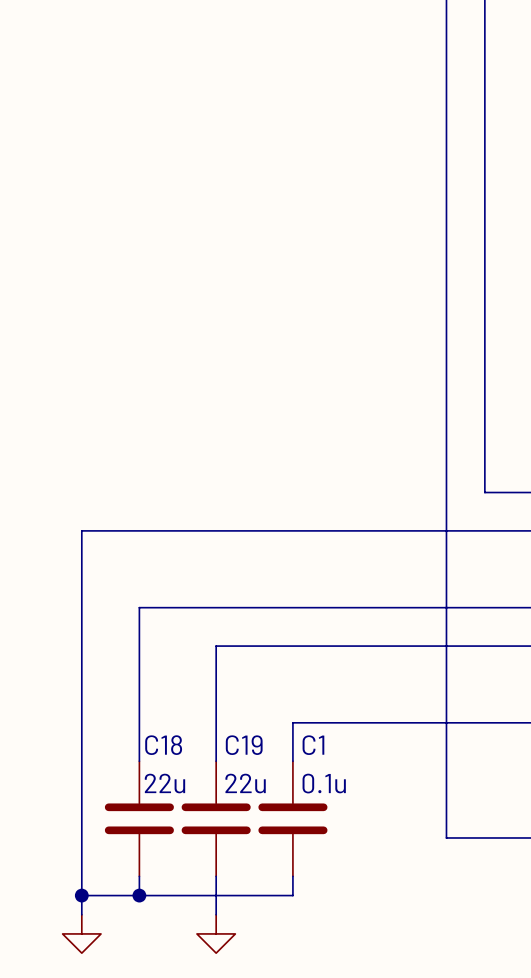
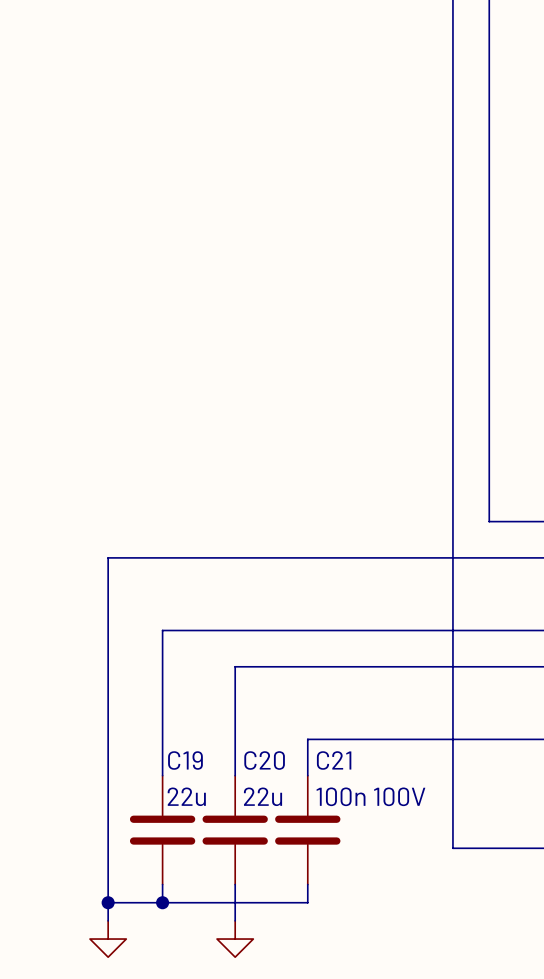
C18 name: C18 (163, 745) -> C19 (185, 760)
C19 name: C19 (244, 745) -> C20 (264, 760)
C1 name: C1 (313, 745) -> C21 (334, 760)
C1 value: 0.1u (324, 783) -> 100n 100V (370, 796)

